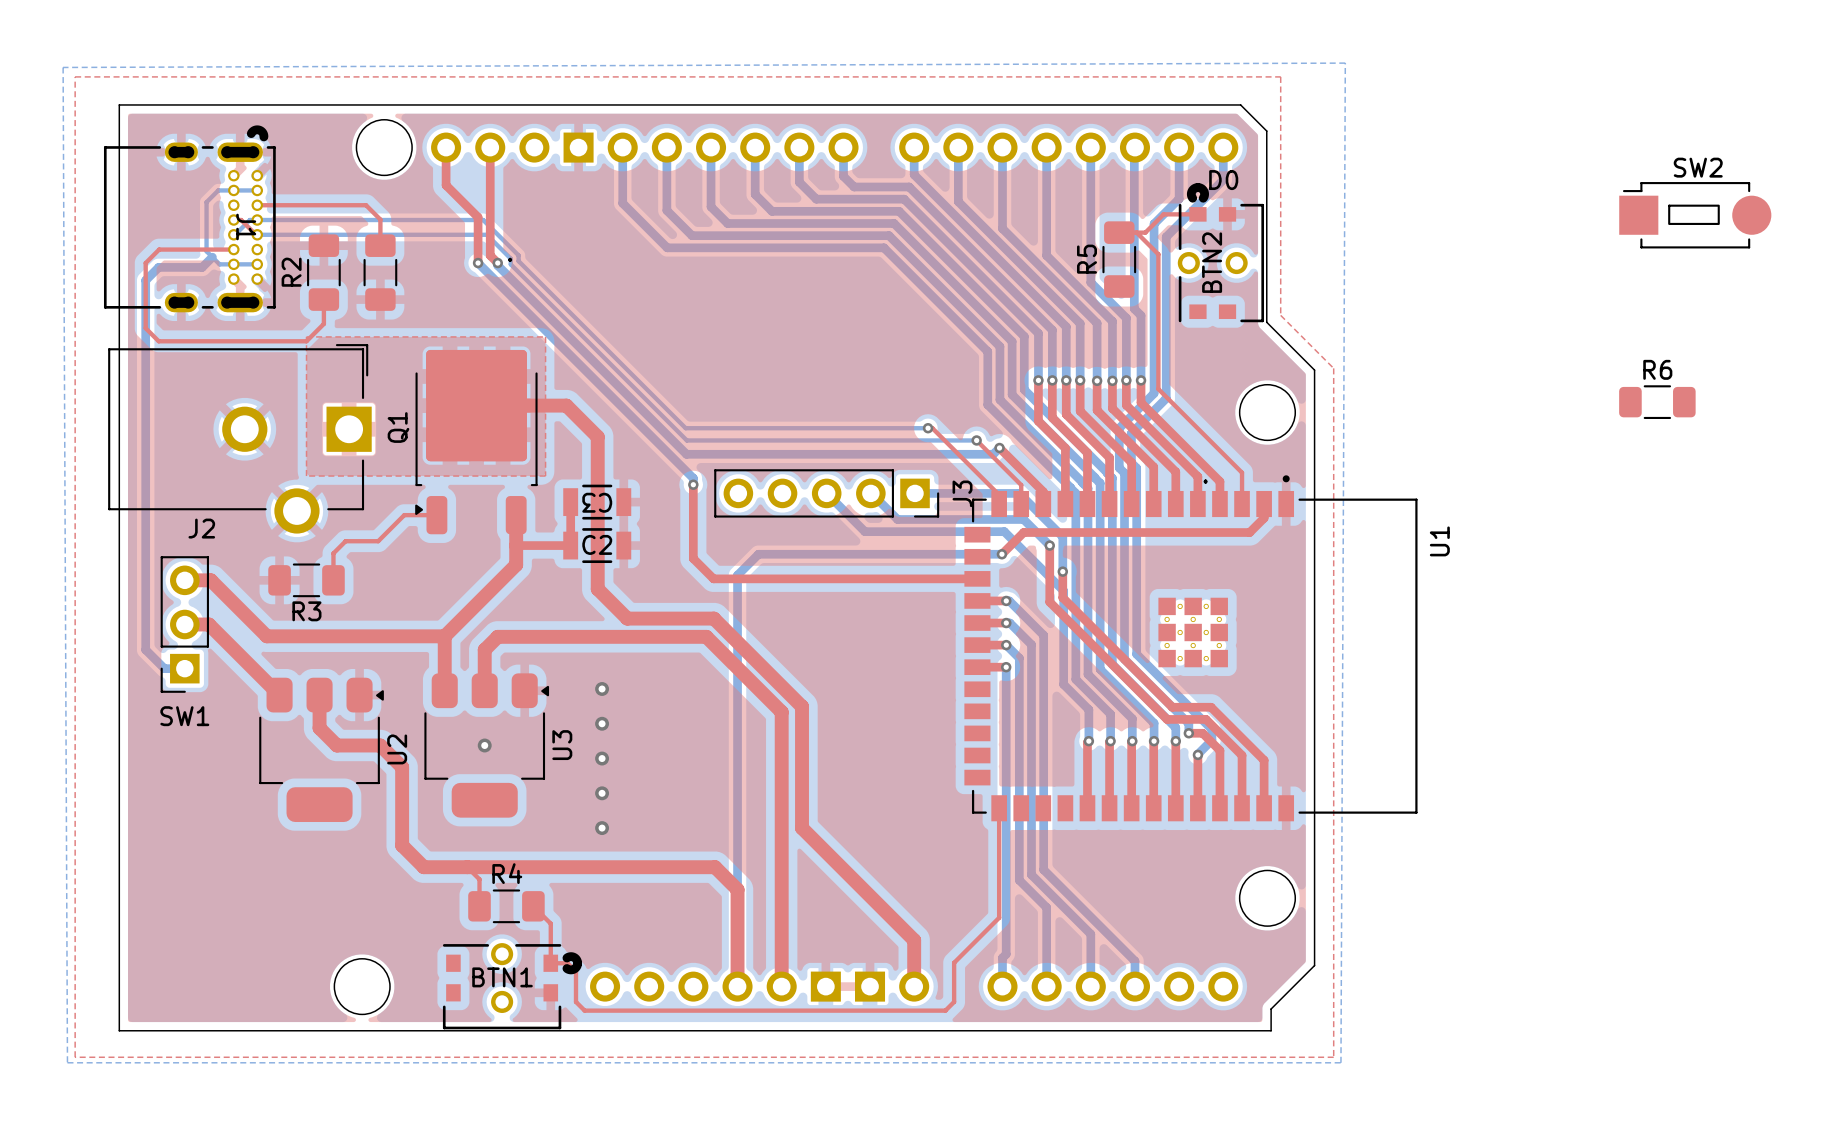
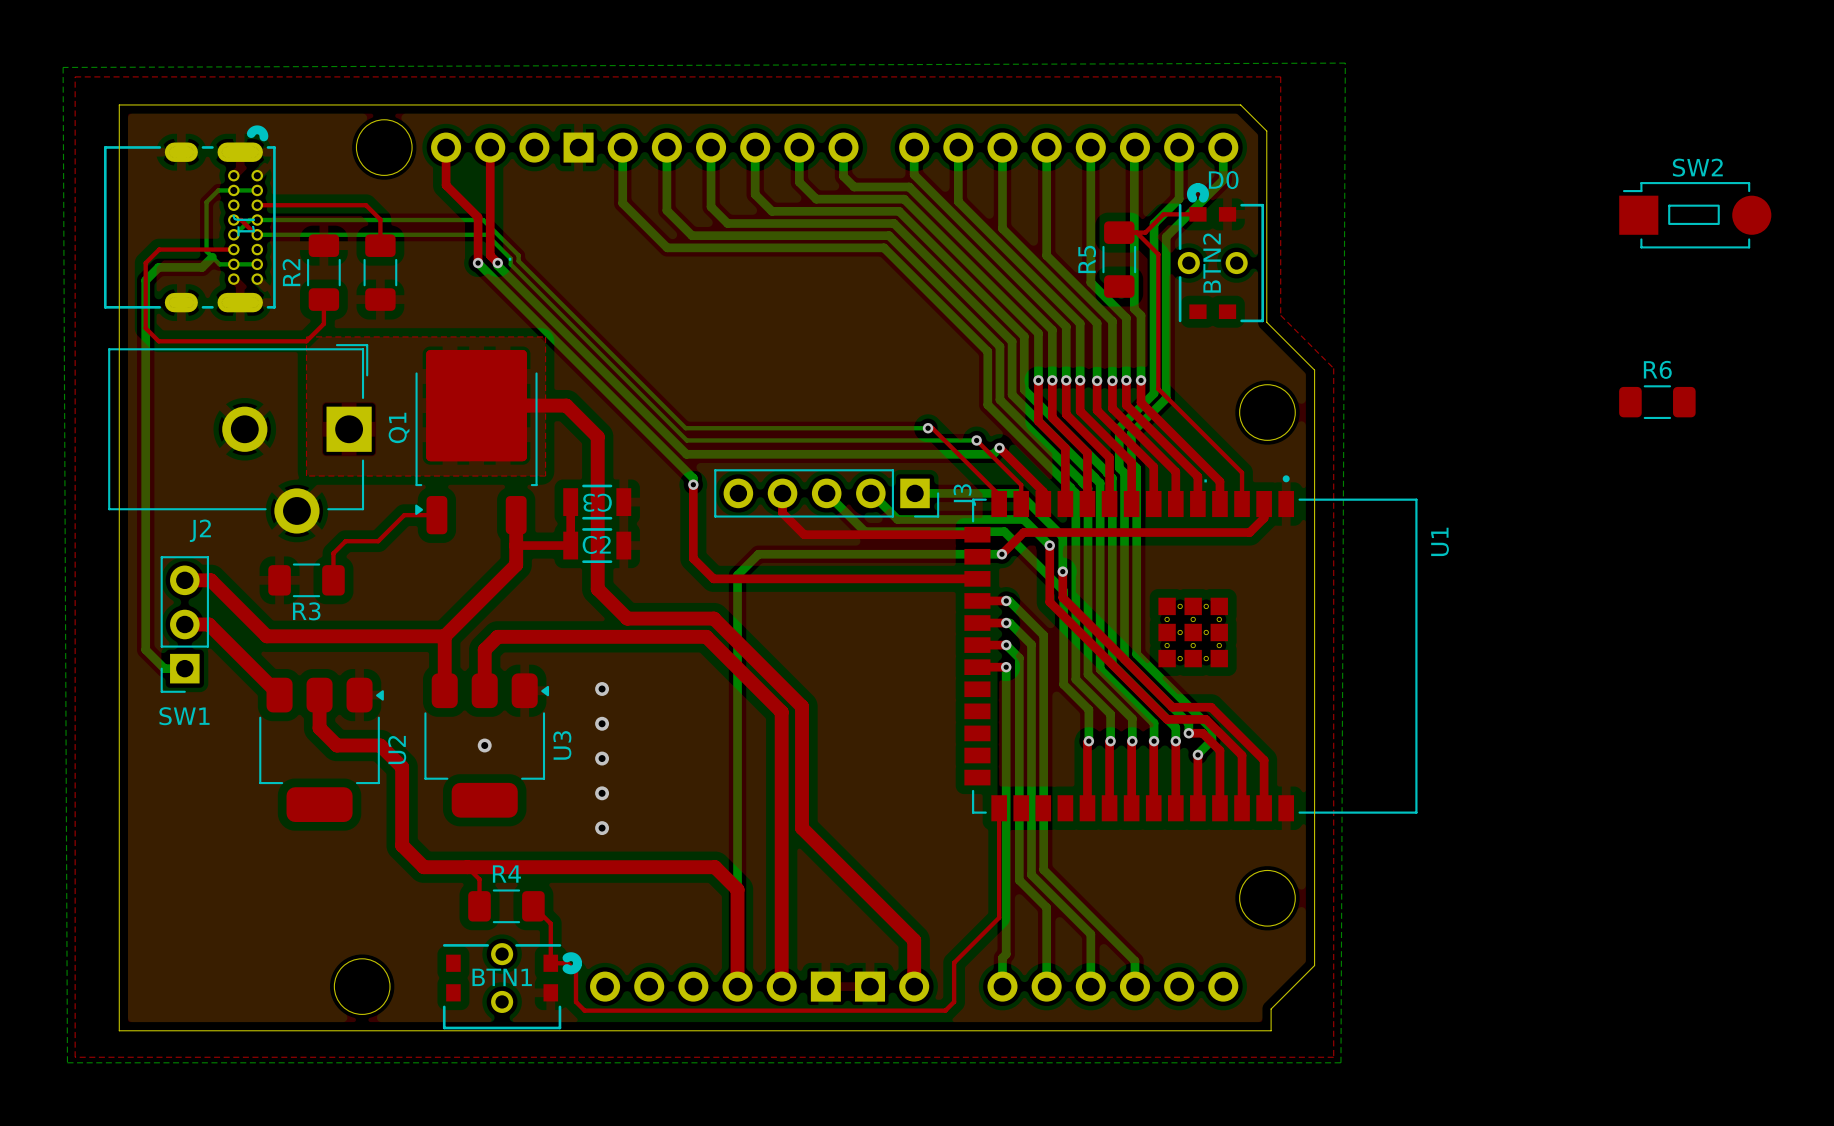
top track: none -> (782, 493) (782, 513) (804, 534) (977, 534)

